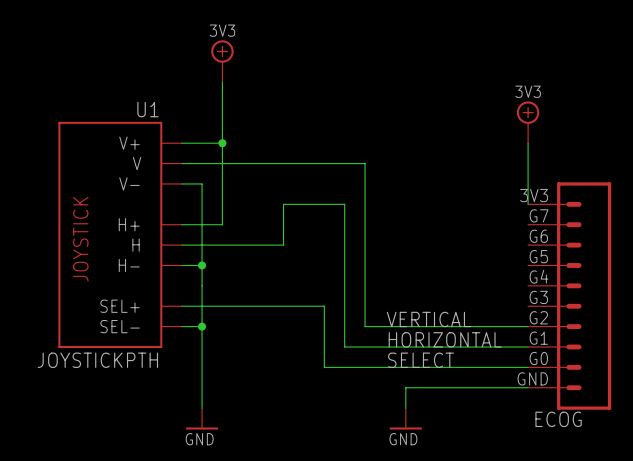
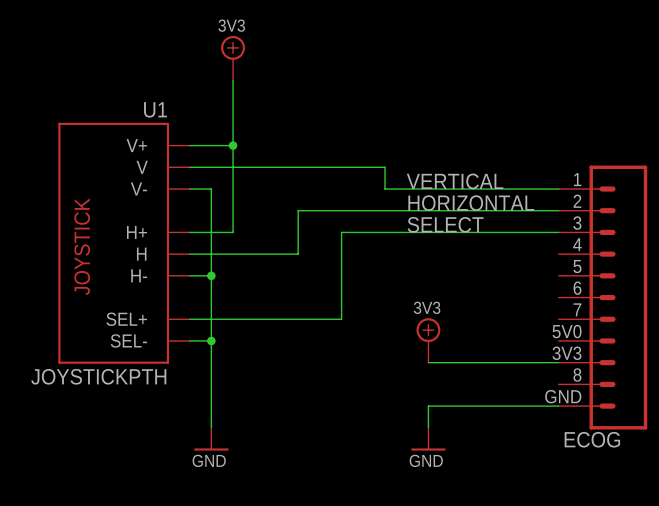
power symbol: 3V3 (528, 122) -> none
wire: (528, 143) (528, 204) -> none
wire: (365, 183) (365, 326) (528, 326) -> (385, 189) (558, 189)
wire: (344, 204) (344, 346) (405, 346) -> (363, 210) (558, 210)
ECOG: none -> (602, 297)
ECOG: (569, 296) -> none
wire: (324, 306) (324, 367) (528, 367) -> (341, 319) (341, 232) (558, 232)
label position: VERTICAL (428, 319) -> VERTICAL (455, 181)
power symbol: none -> 3V3 (428, 340)
label position: HORIZONTAL (445, 339) -> HORIZONTAL (471, 203)
label position: SELECT (421, 360) -> SELECT (445, 224)

